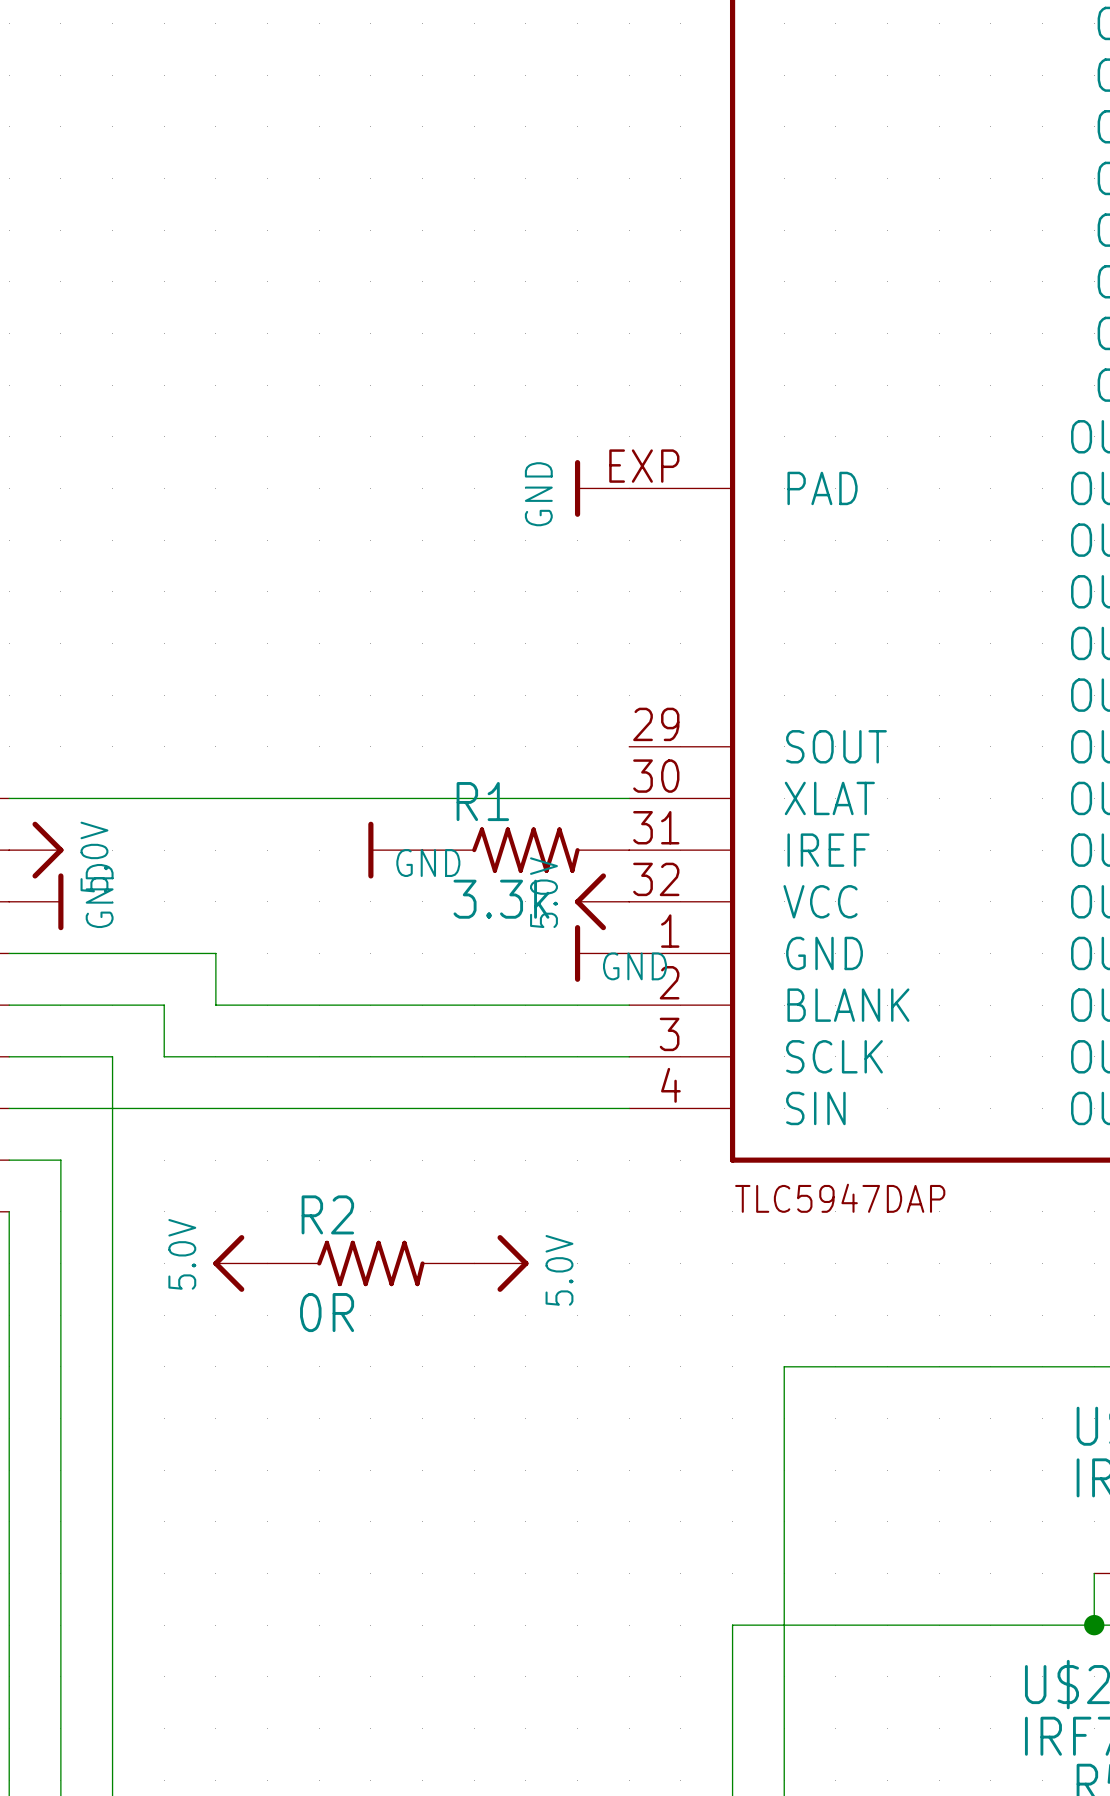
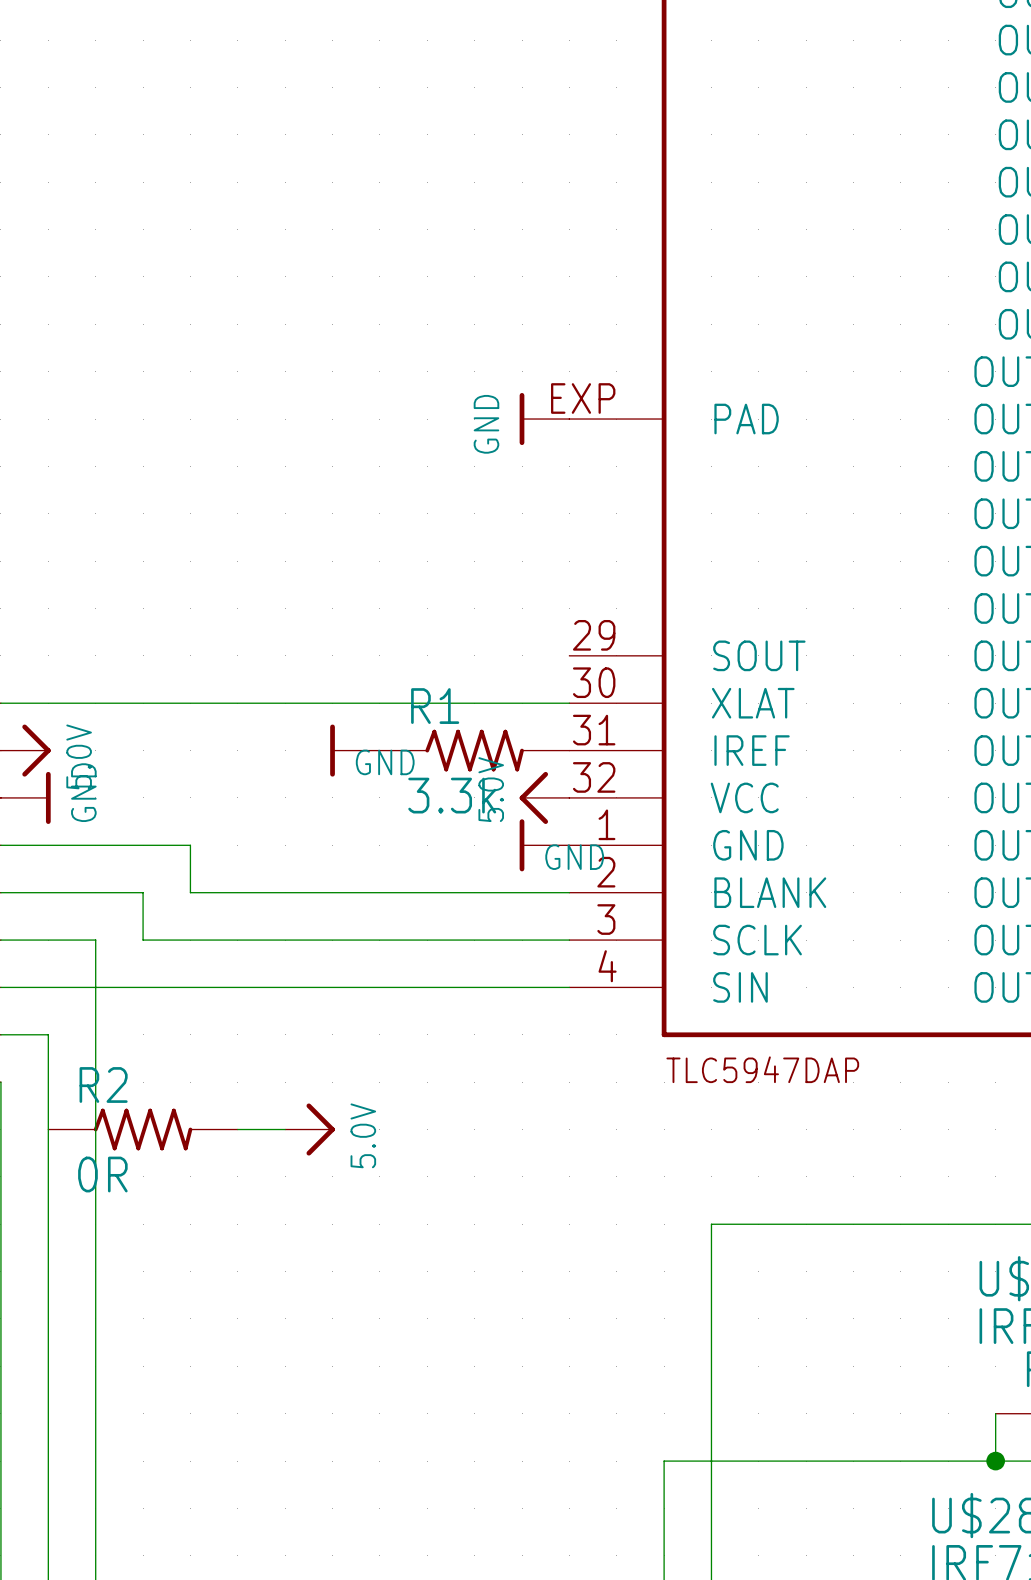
power symbol: 5.0V (240, 1263) -> none
power symbol: none -> 5.0V (310, 1129)
R2 position: (370, 1263) -> (143, 1129)
power symbol: 5.0V (501, 1263) -> none

